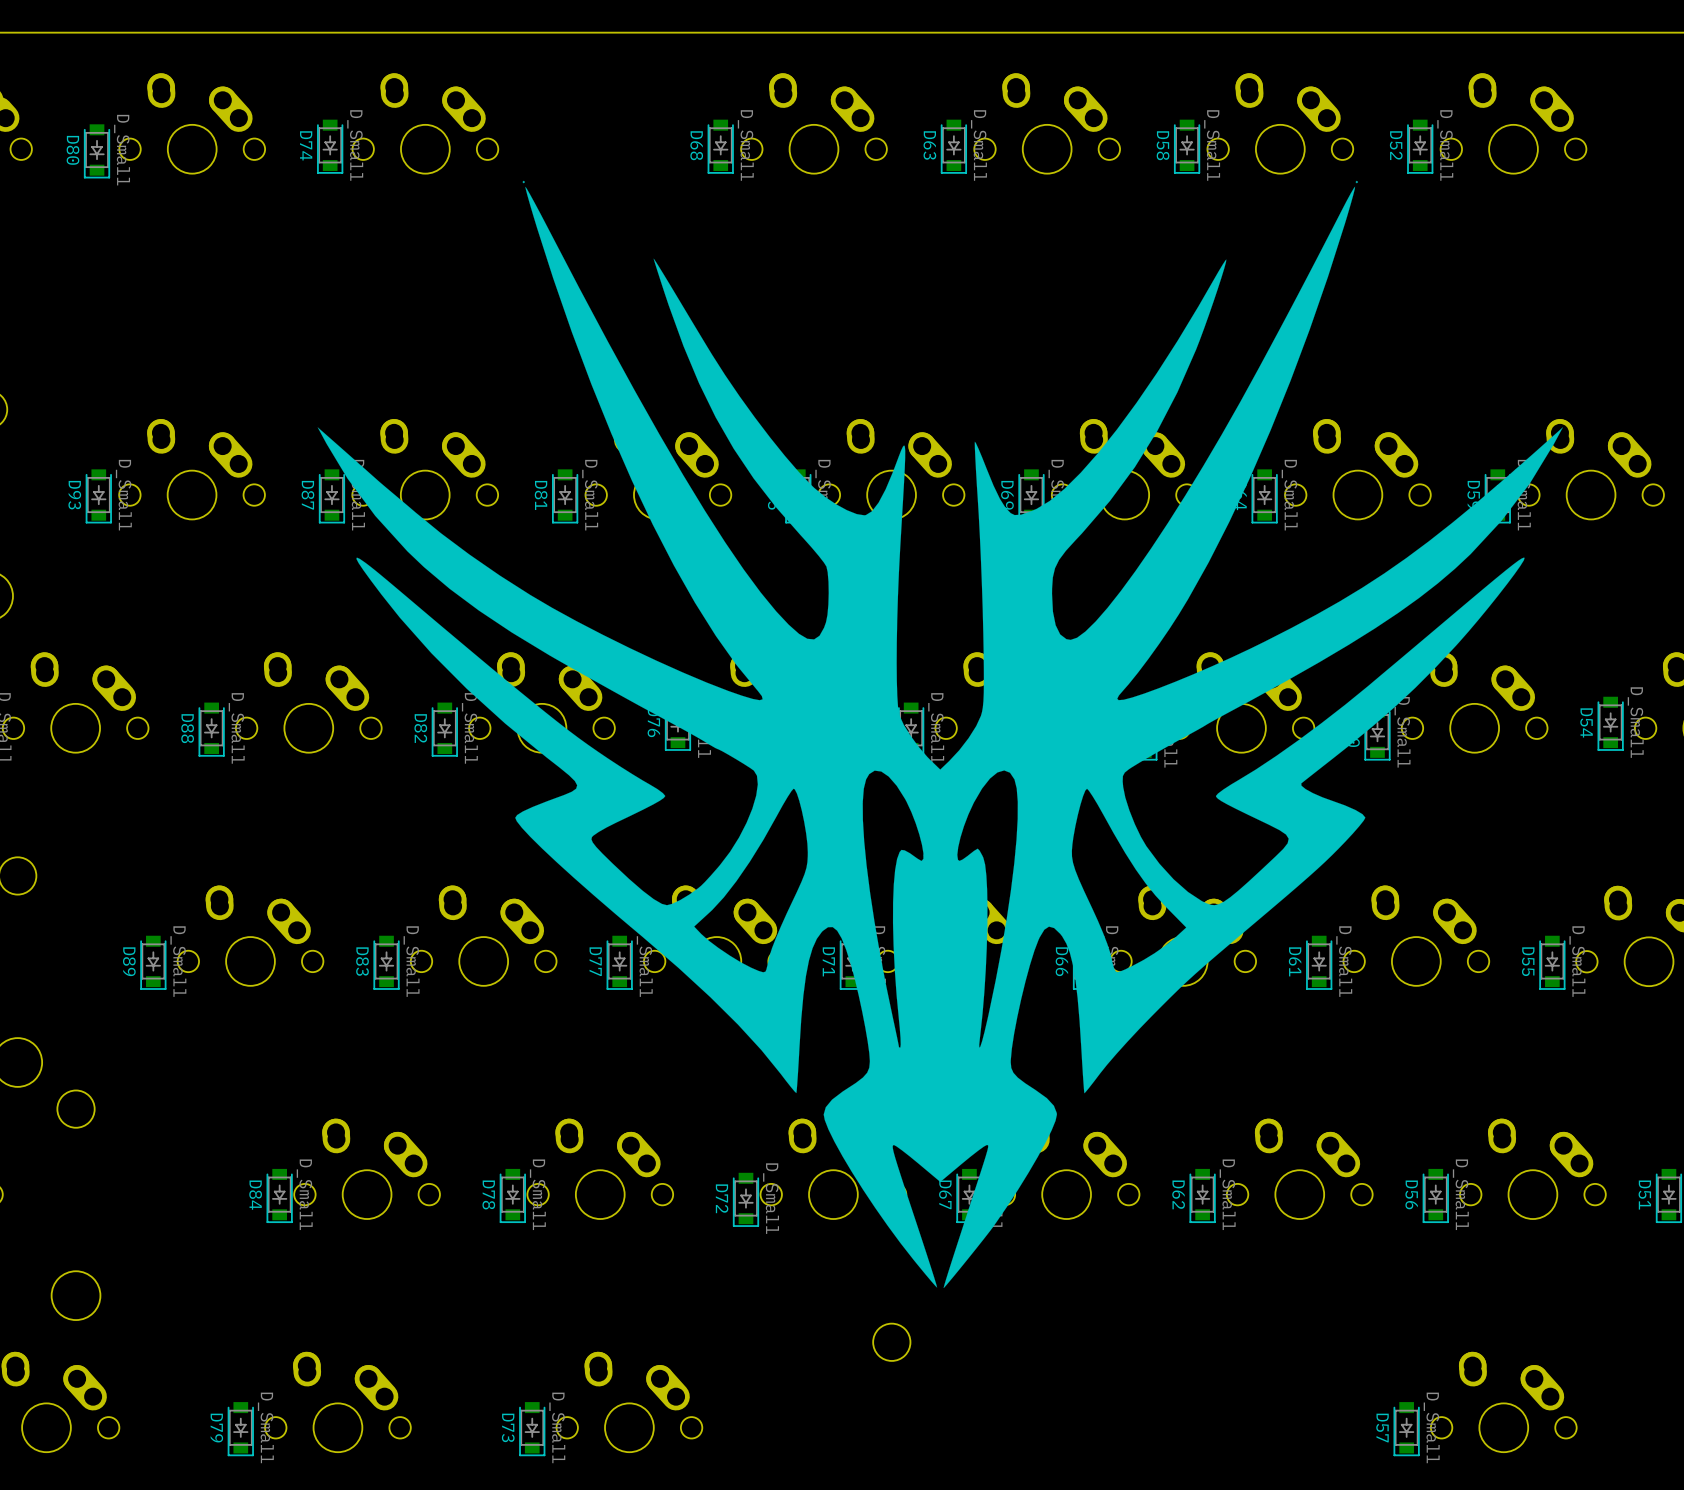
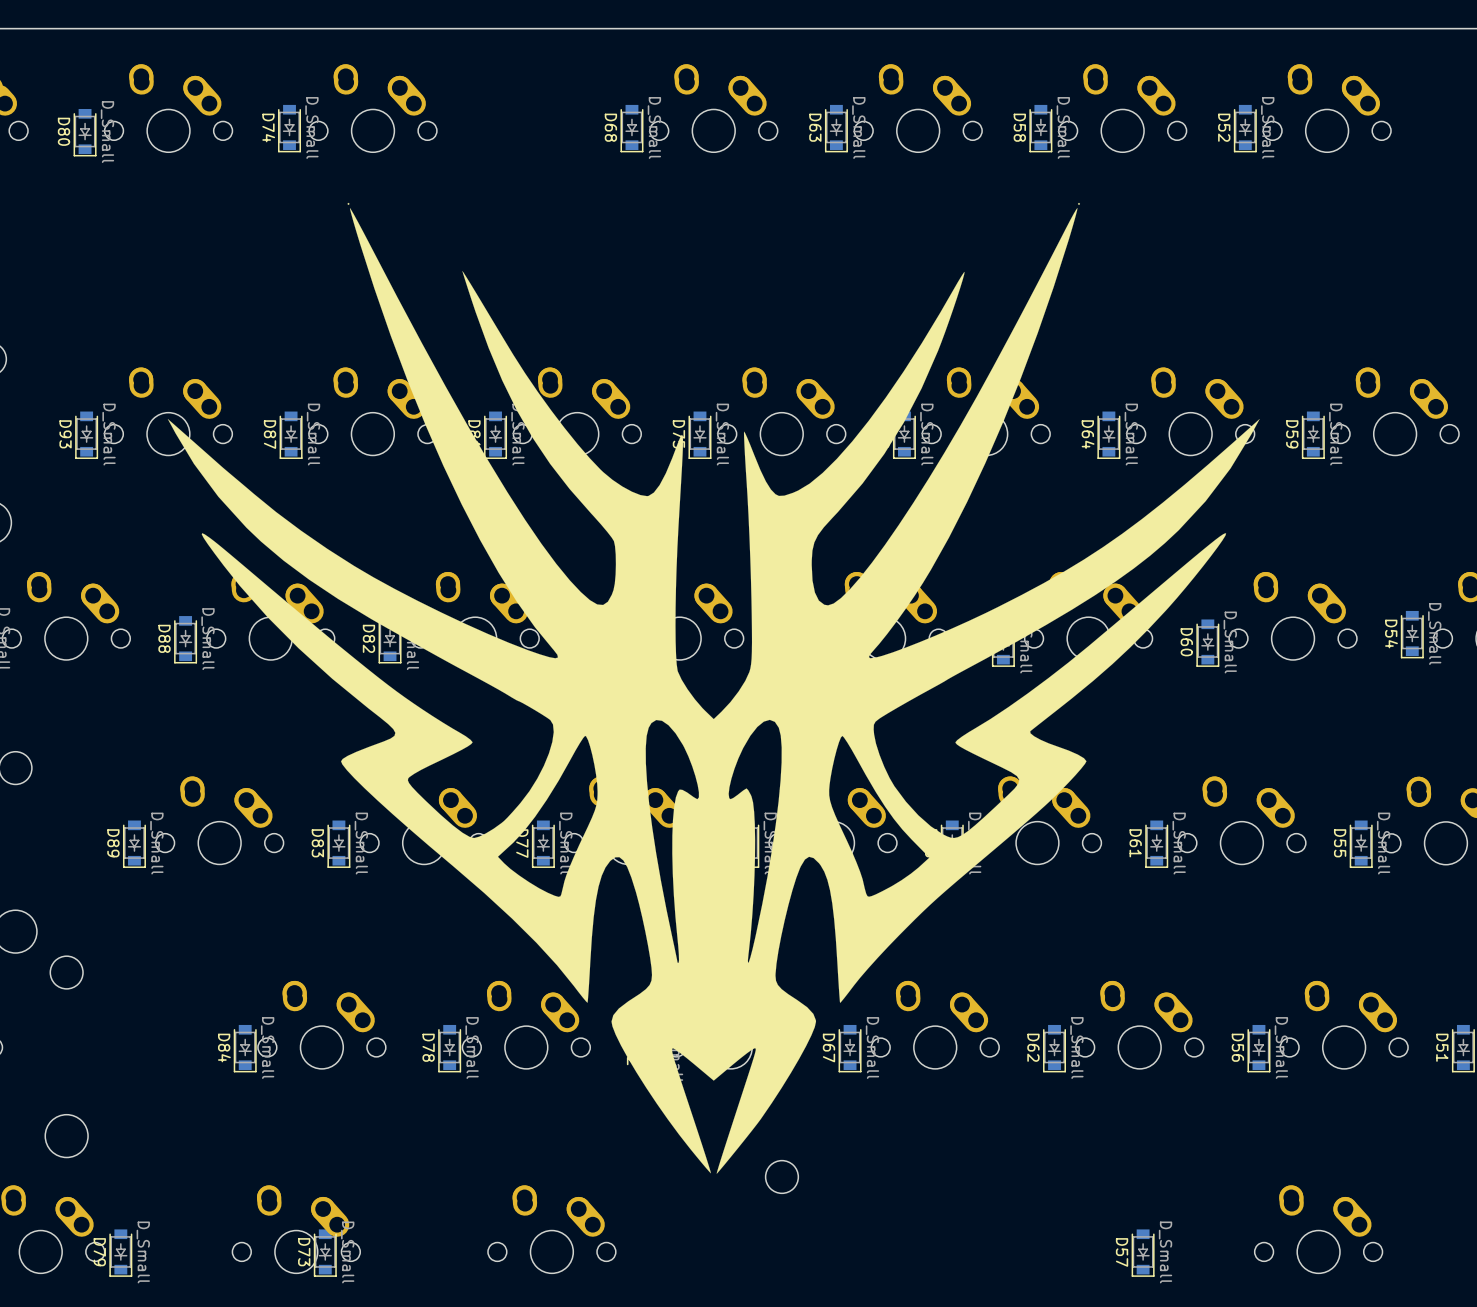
drawing: [317, 180, 1563, 1289] -> none
drawing: none -> [167, 202, 1260, 1174]
D79 position: (240, 1429) -> (120, 1253)
D73 position: (532, 1429) -> (325, 1253)
D57 position: (1406, 1429) -> (1143, 1253)

